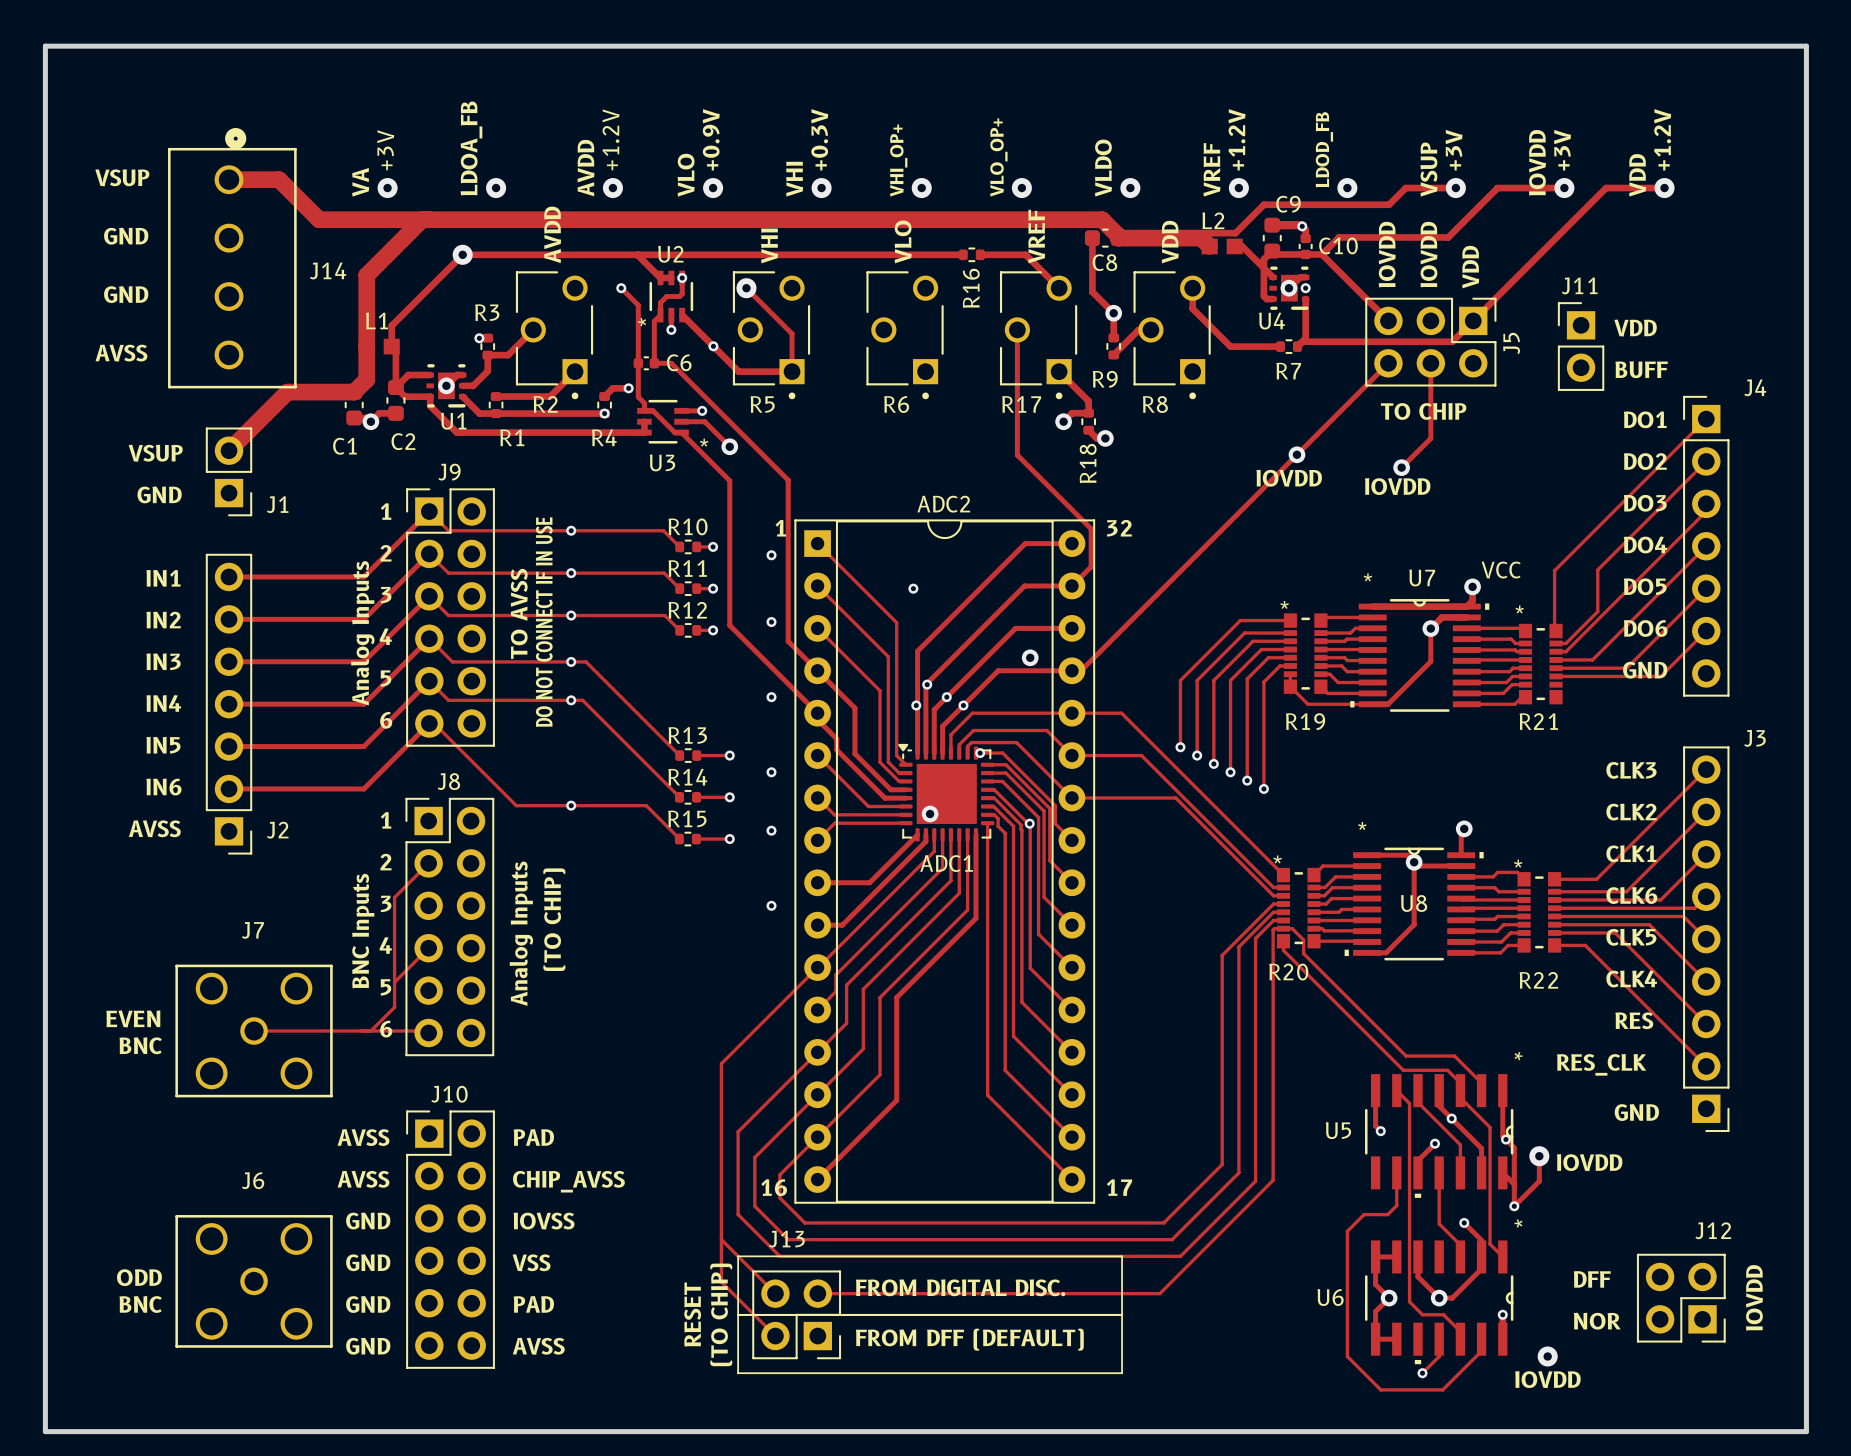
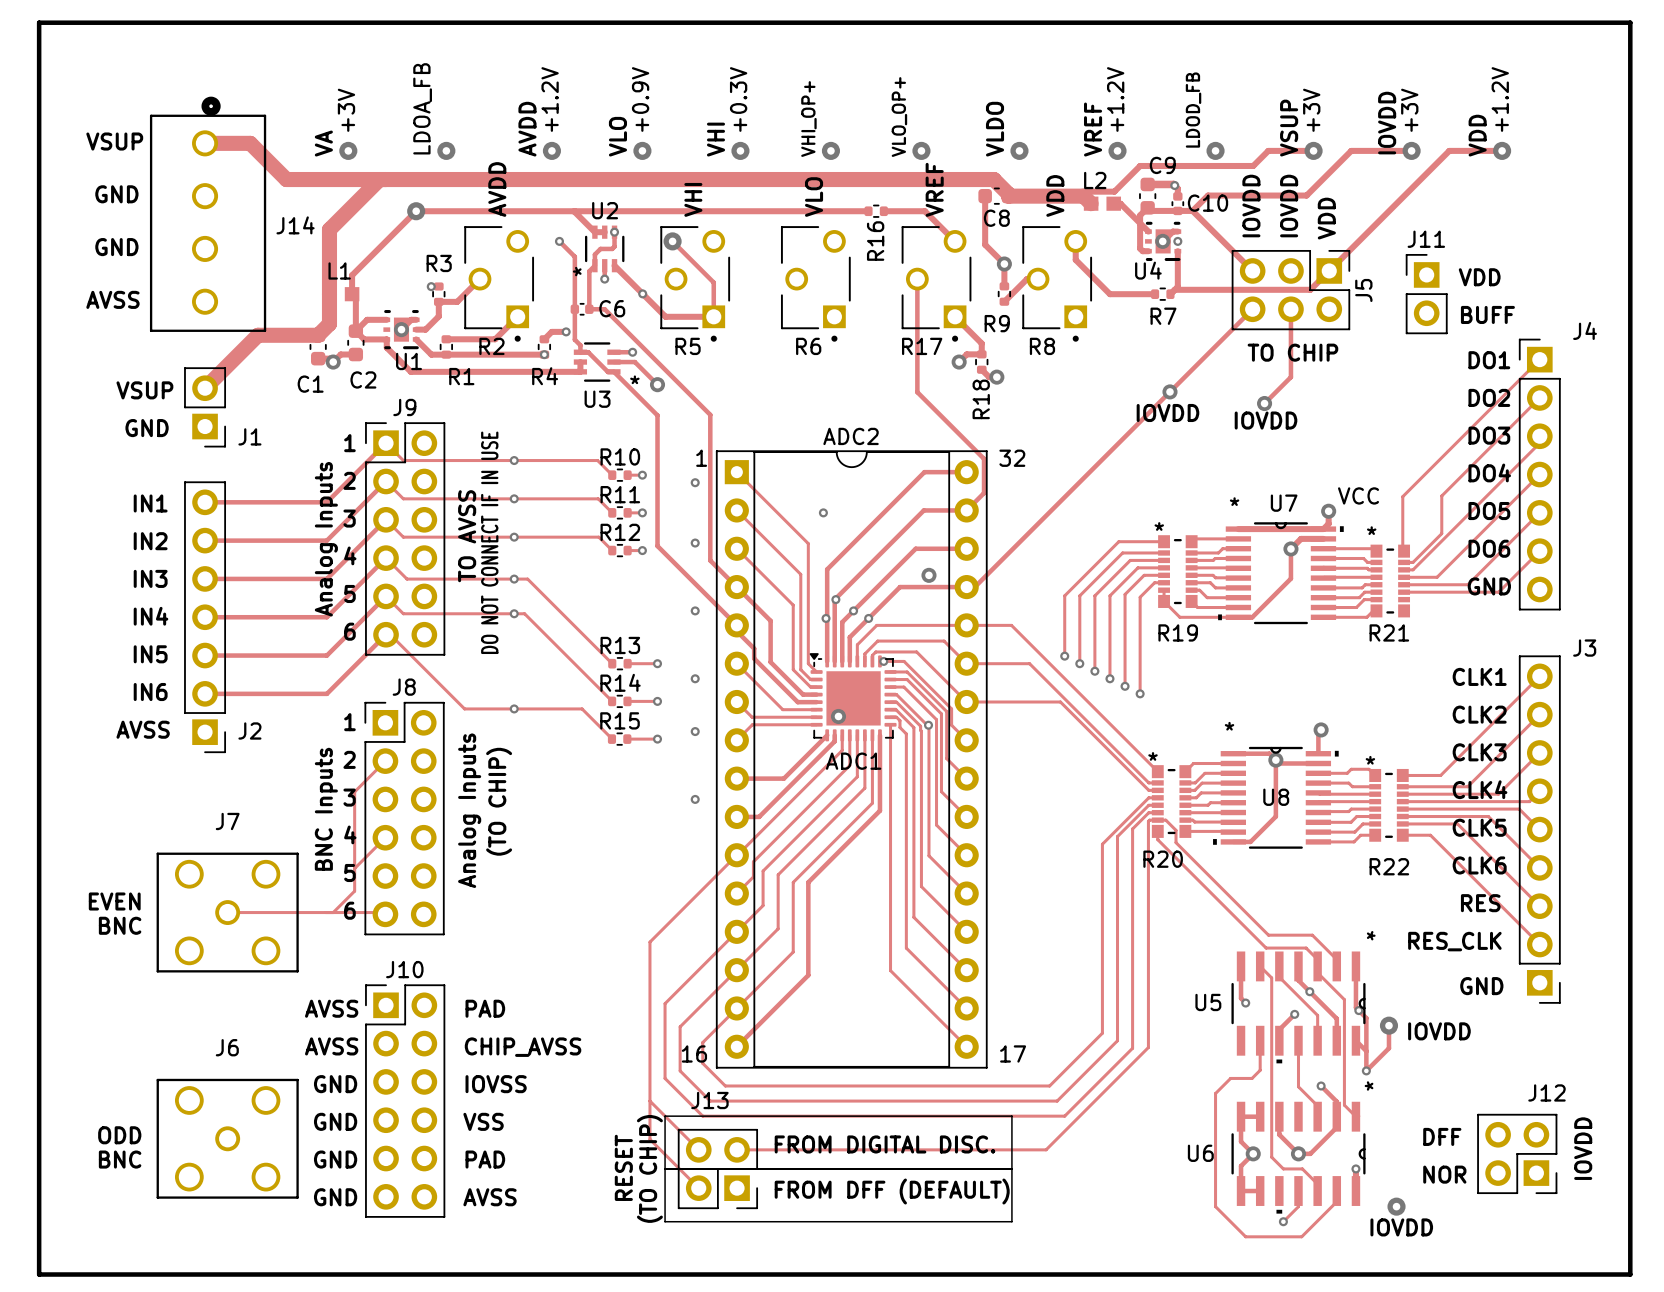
text: CLK3 (1631, 770) -> CLK1 (1479, 676)
text: CLK1 (1631, 853) -> CLK3 (1479, 752)
text: CLK6 (1631, 895) -> CLK4 (1480, 789)
text: CLK4 (1631, 978) -> CLK6 (1479, 865)

